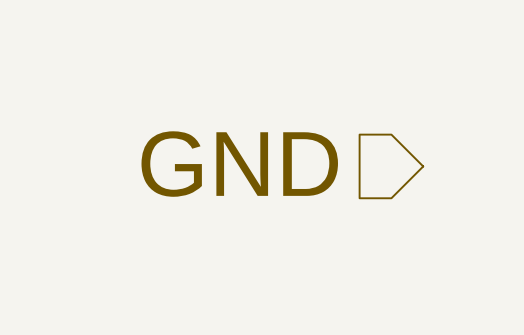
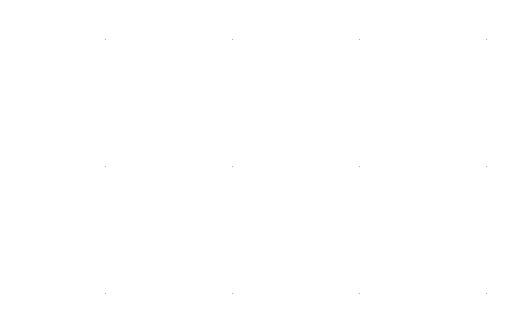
hierarchical label: GND (239, 164) -> none

